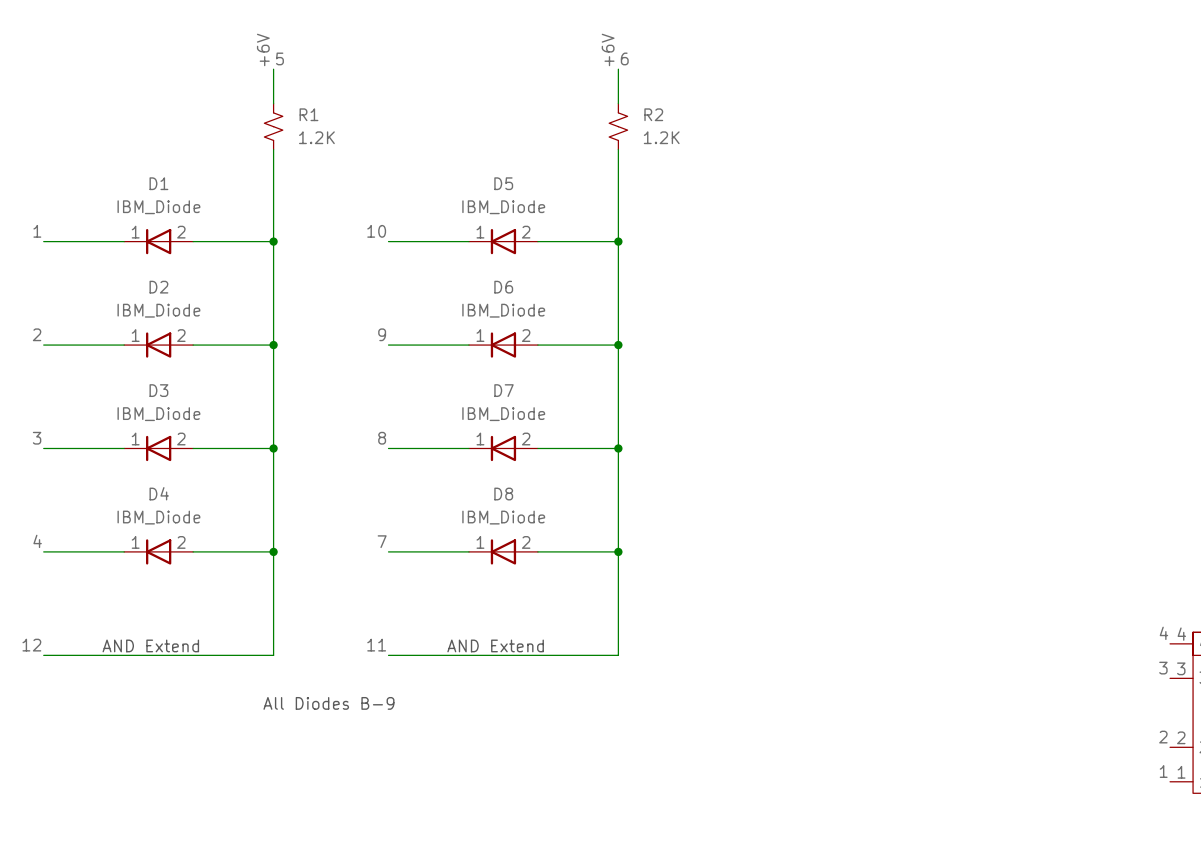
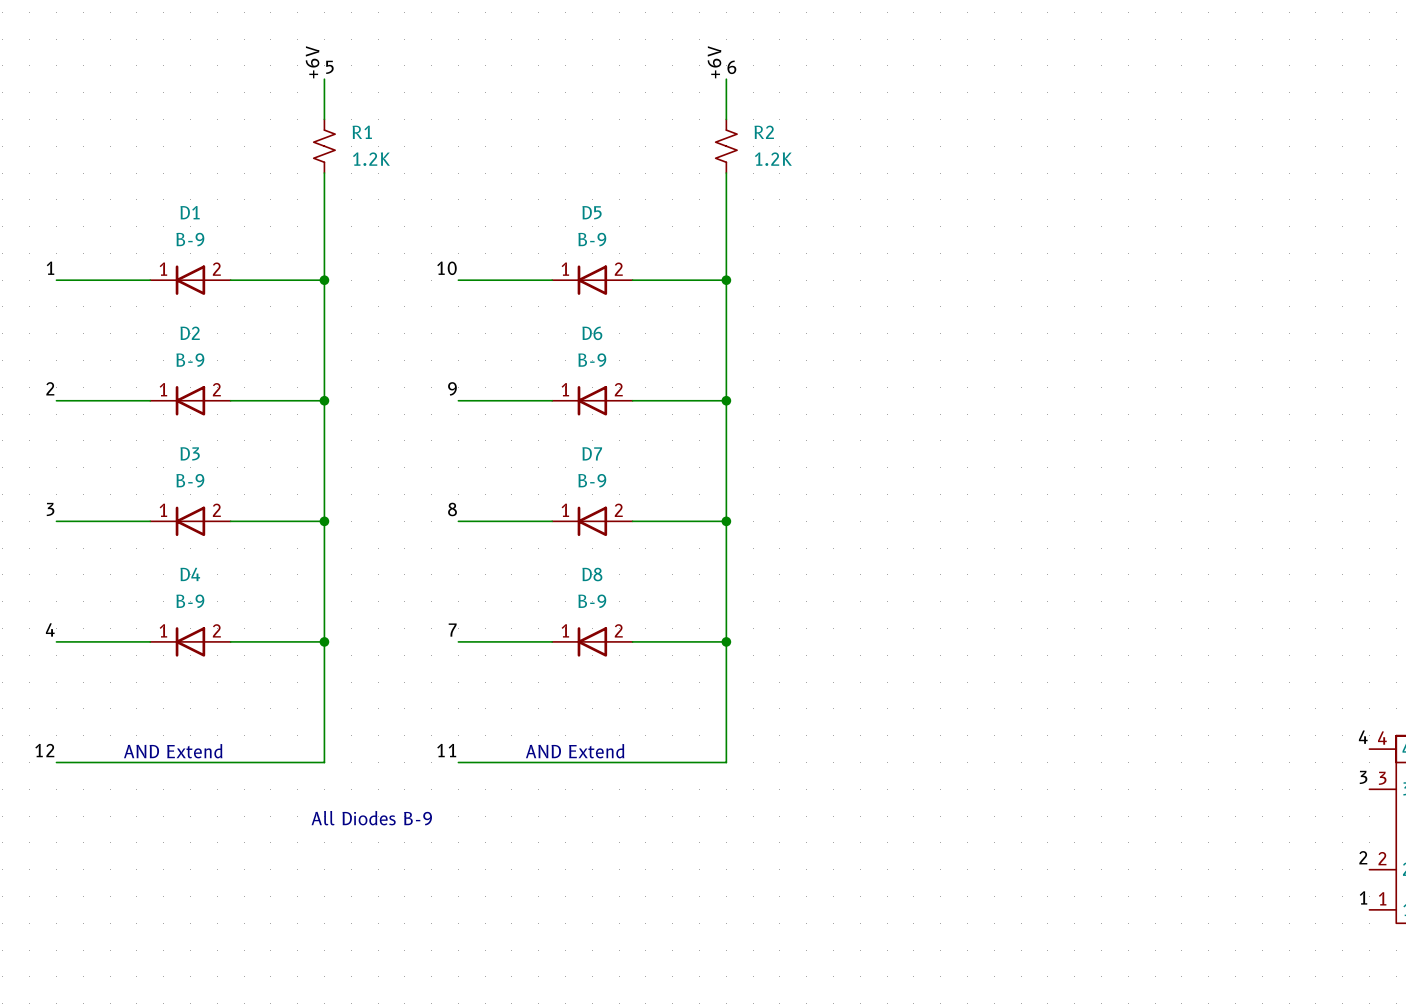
D1 value: IBM_Diode (158, 207) -> B-9 (190, 239)
D5 value: IBM_Diode (503, 207) -> B-9 (592, 239)
D2 value: IBM_Diode (158, 310) -> B-9 (190, 360)
D6 value: IBM_Diode (503, 310) -> B-9 (592, 360)
D3 value: IBM_Diode (158, 414) -> B-9 (190, 480)
D7 value: IBM_Diode (503, 414) -> B-9 (592, 480)
D4 value: IBM_Diode (158, 517) -> B-9 (190, 601)
D8 value: IBM_Diode (503, 517) -> B-9 (592, 601)

